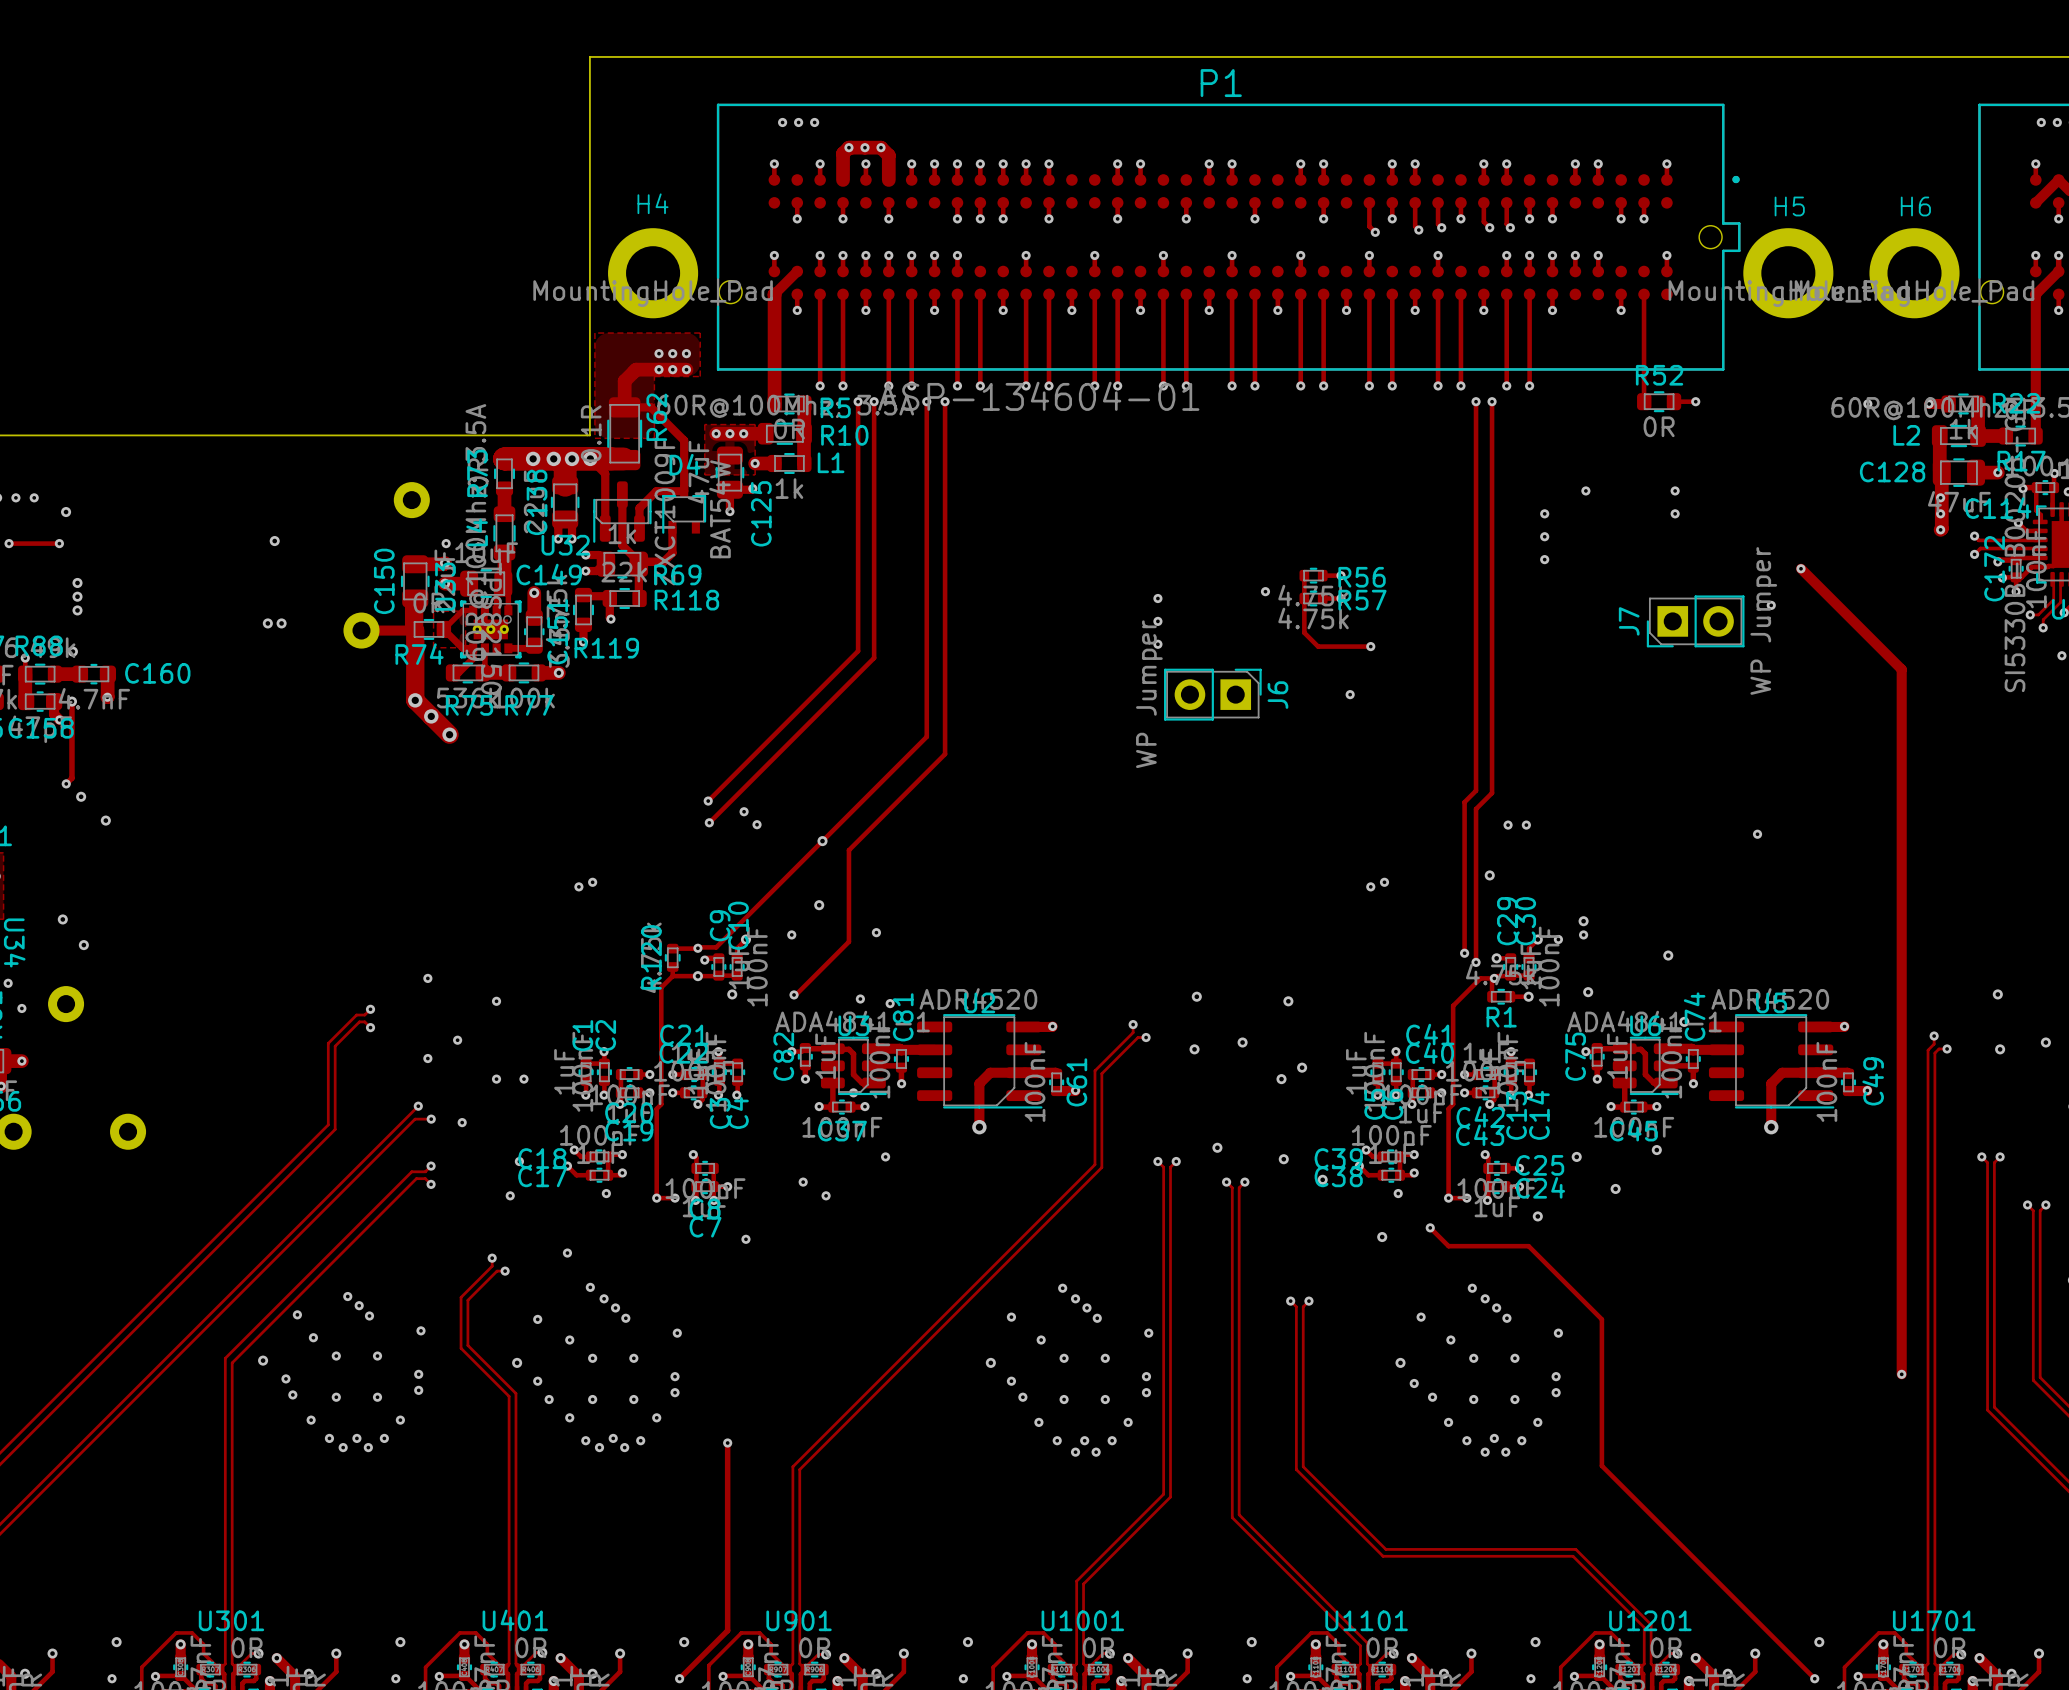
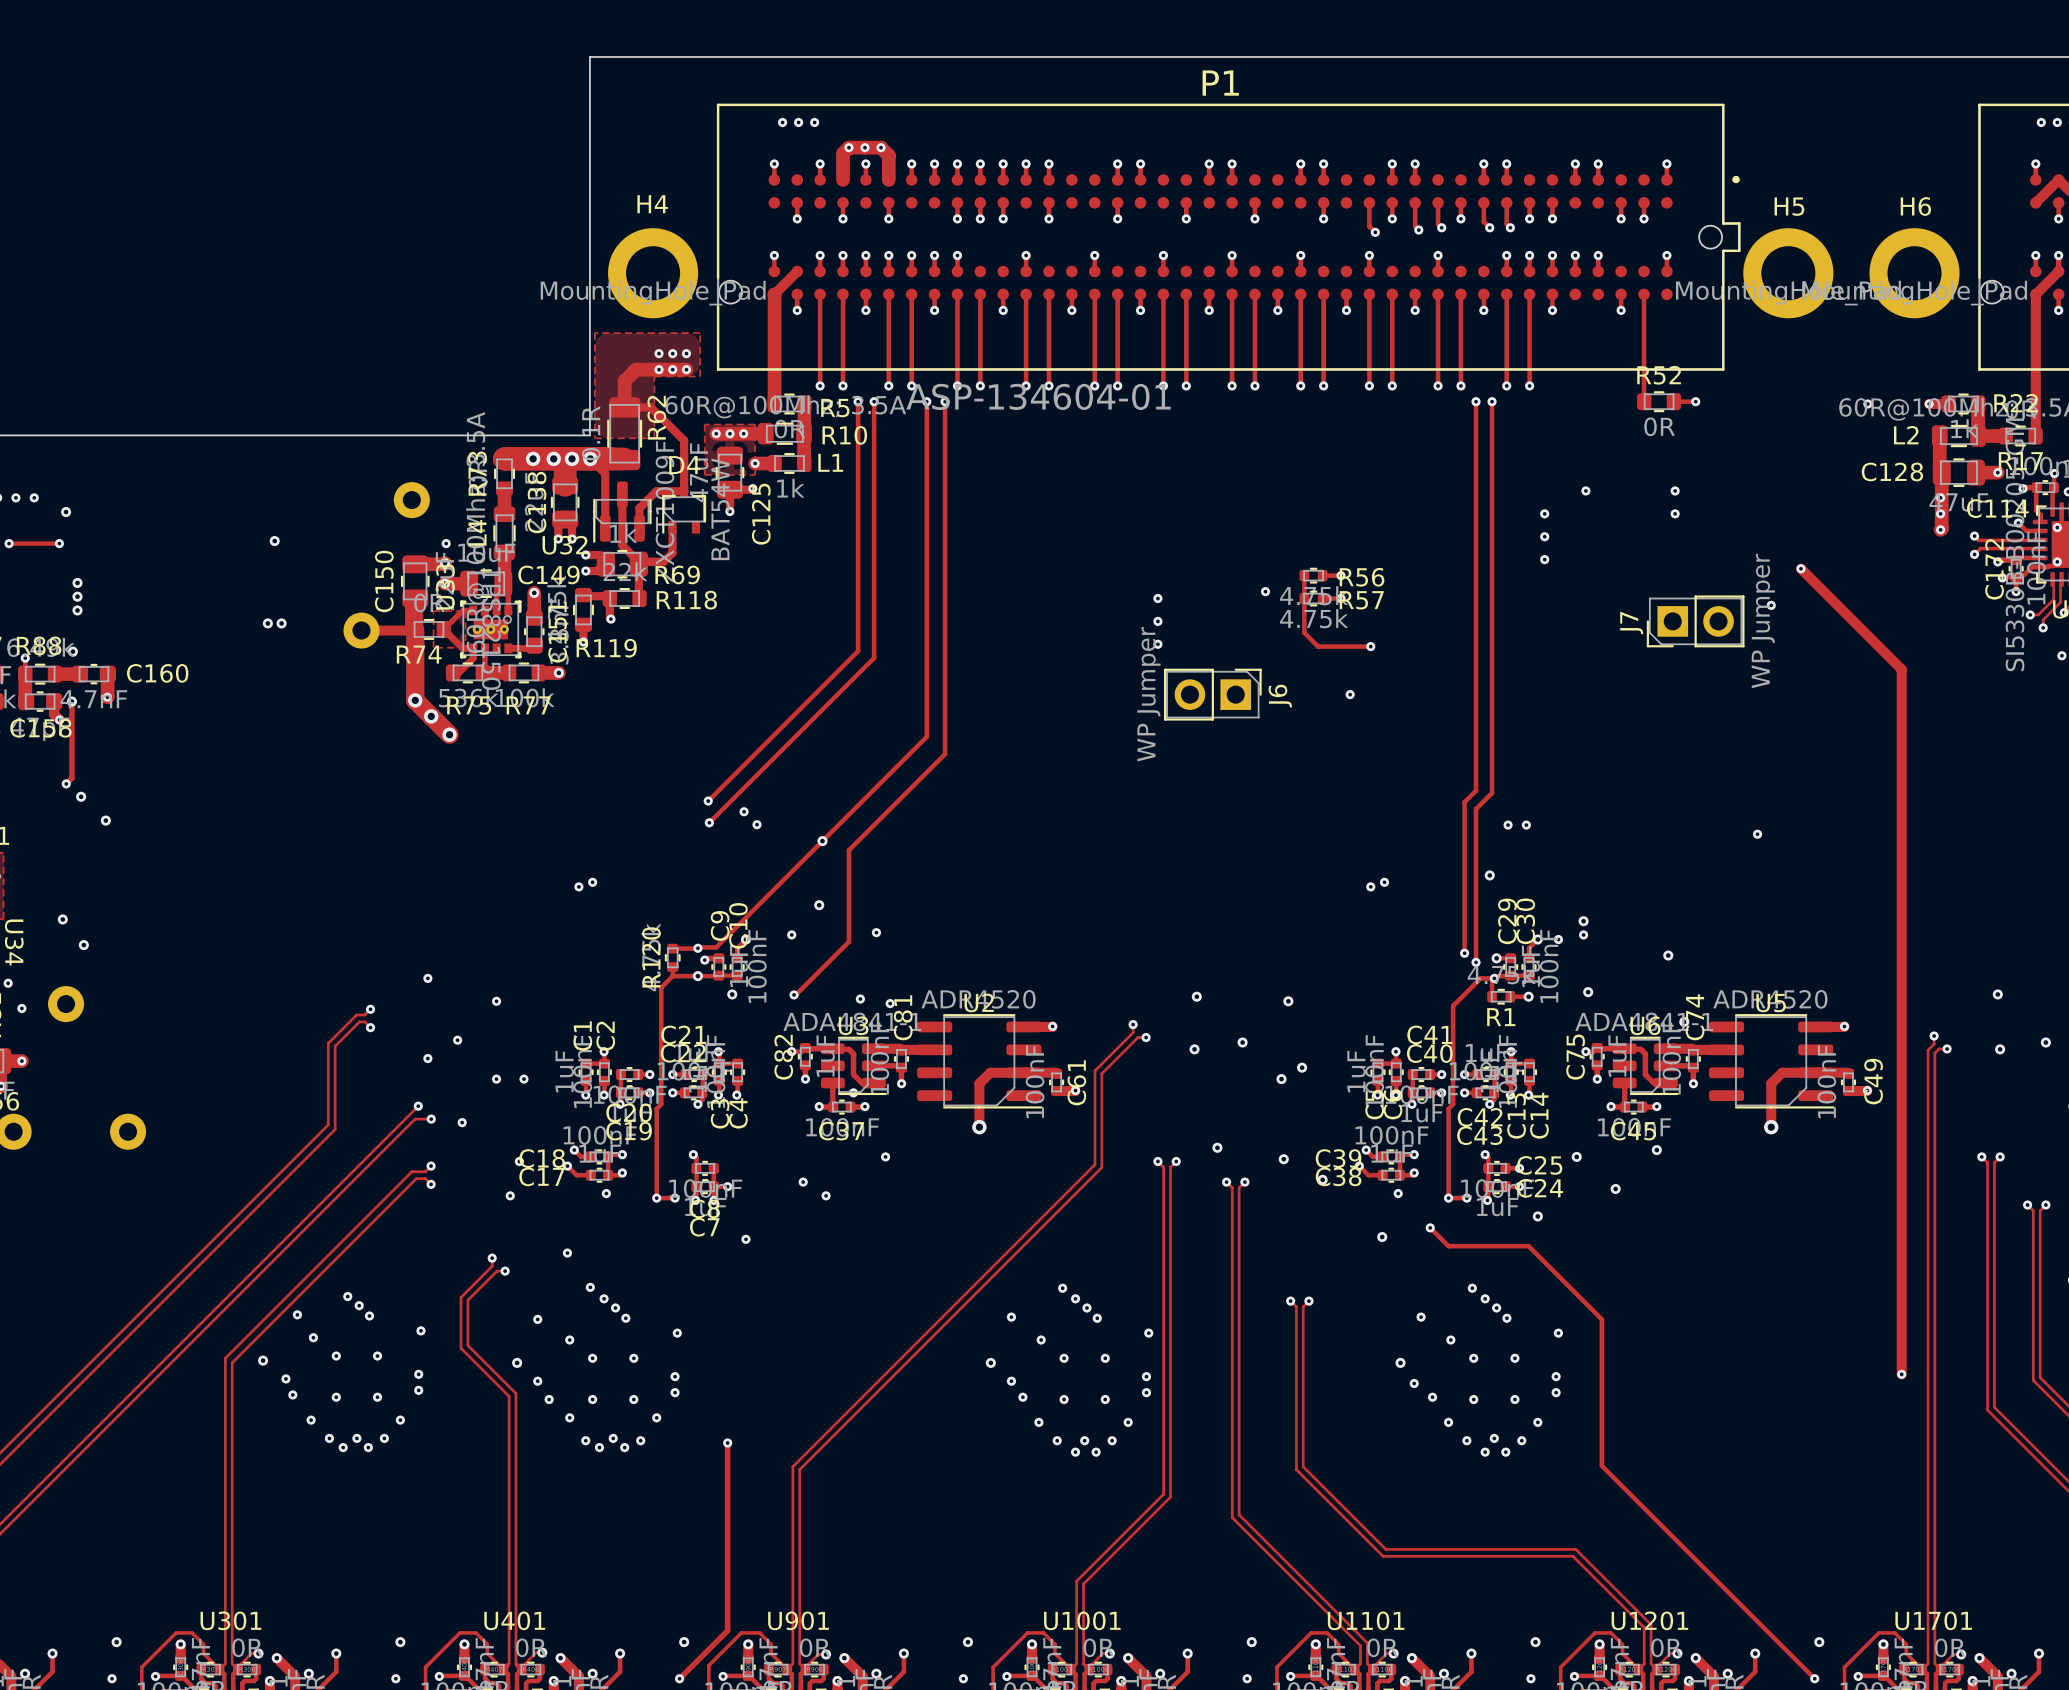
via: none -> (2057, 527)
via: none -> (2057, 561)

